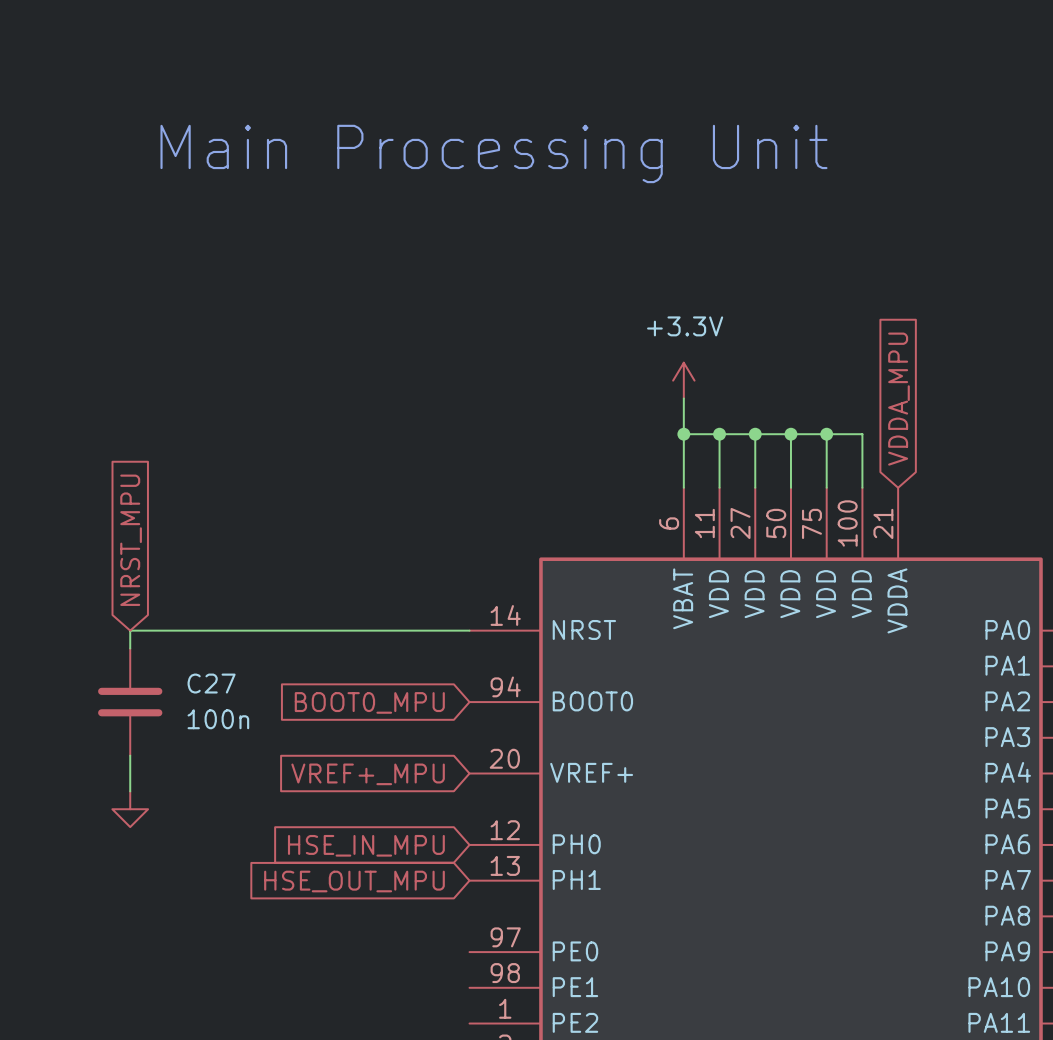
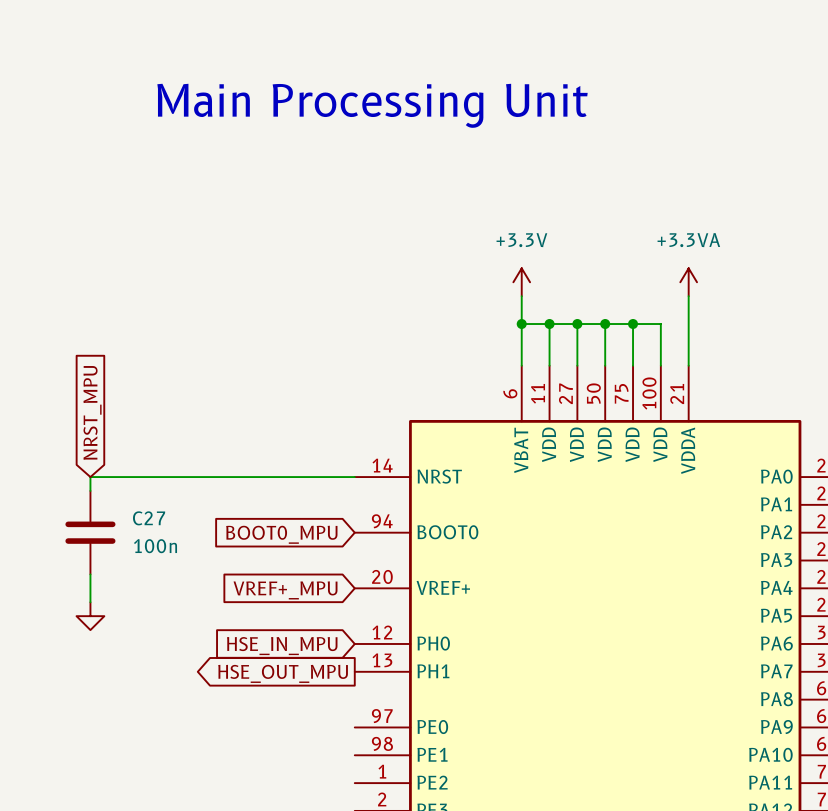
power symbol: none -> +3.3VA (688, 282)
wire: none -> (688, 296) (688, 365)
global label: VDDA_MPU (898, 399) -> none
global label shape: input (354, 881) -> output (283, 673)

